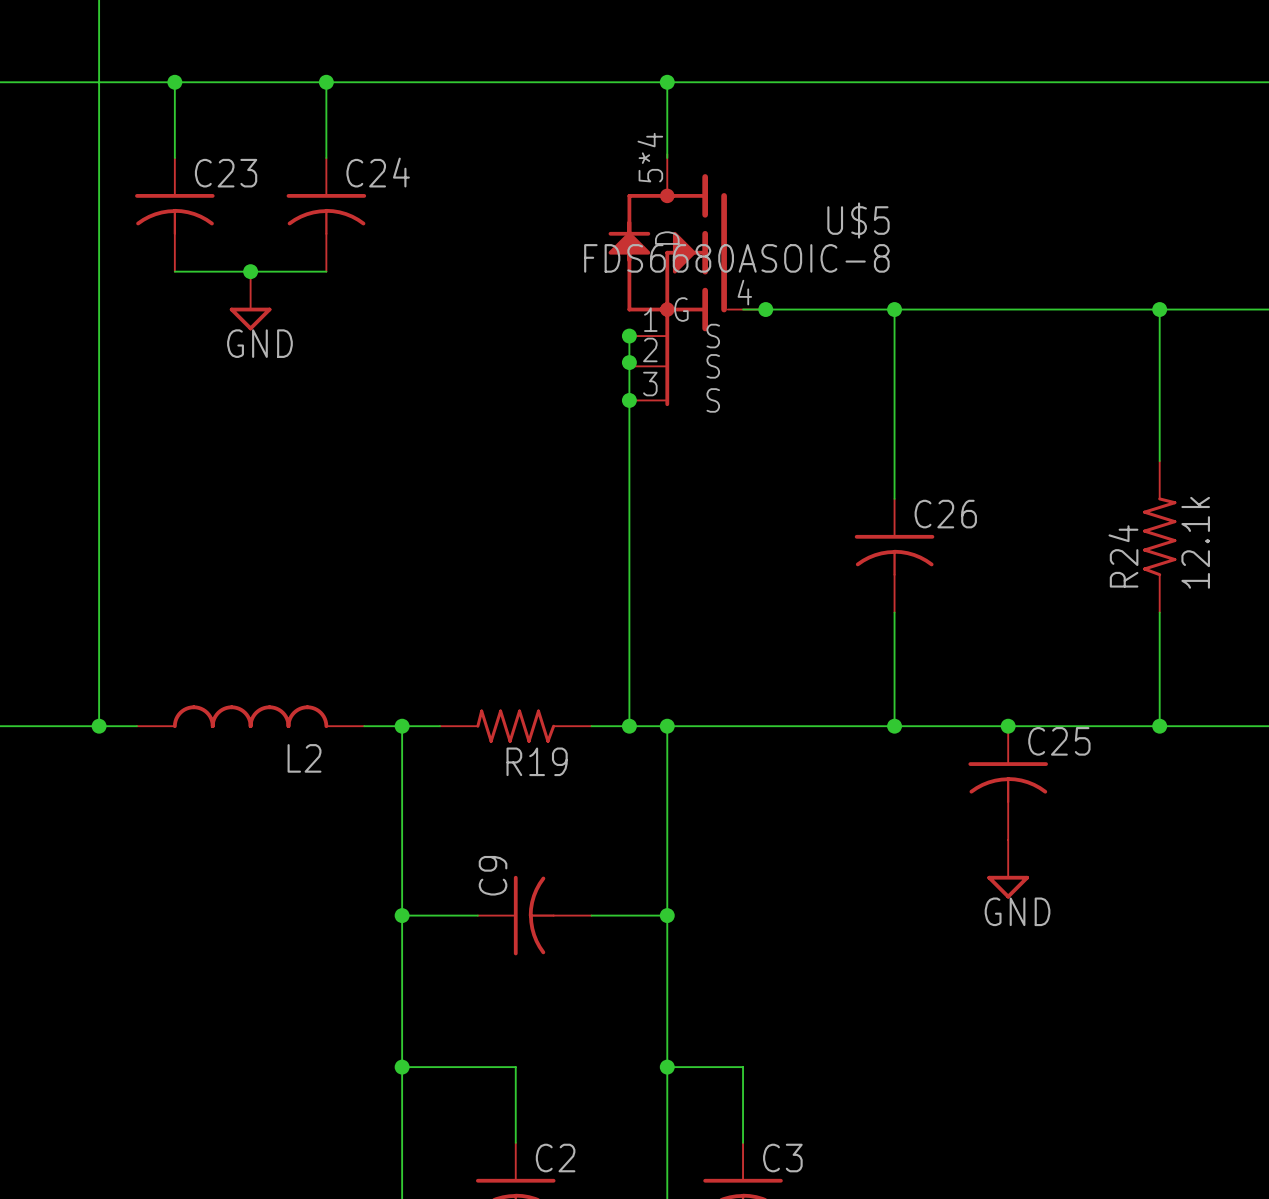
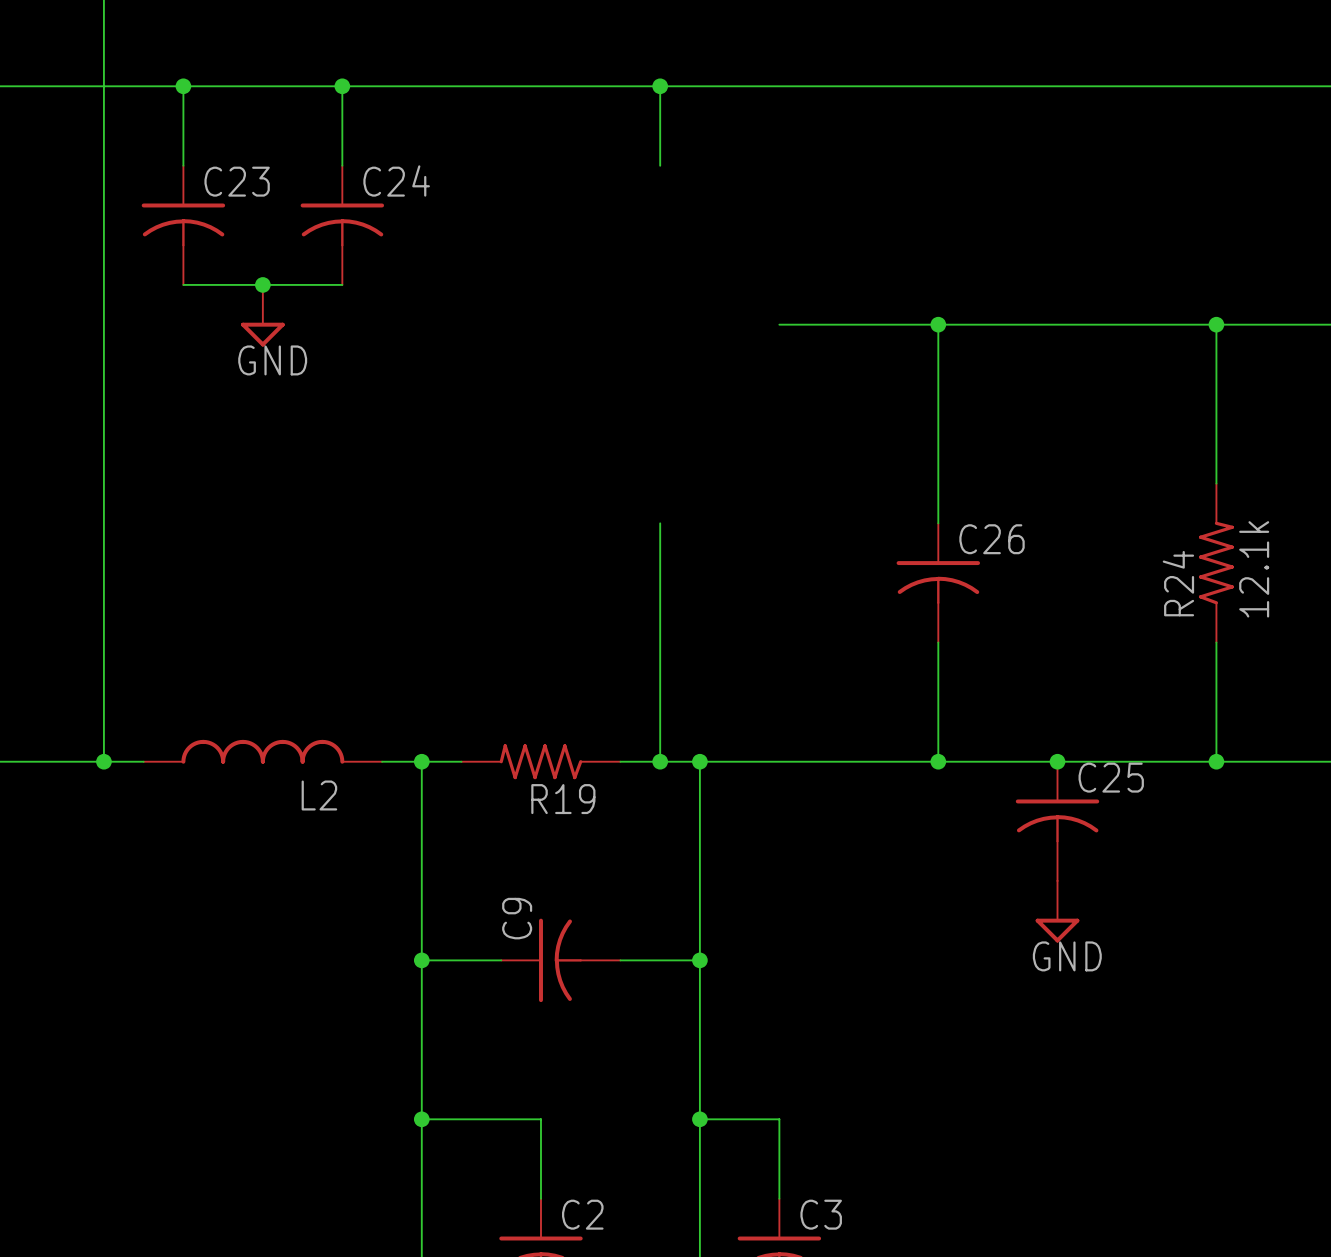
wire: (667, 82) (667, 158) -> (660, 86) (660, 165)
junction position: (667, 82) -> (660, 86)
U$5: FDS6680ASOIC-8 (687, 280) -> none
junction: (765, 309) -> none
wire: (629, 332) (629, 498) -> none
junction: (629, 336) -> none
junction: (629, 362) -> none
junction: (629, 400) -> none

